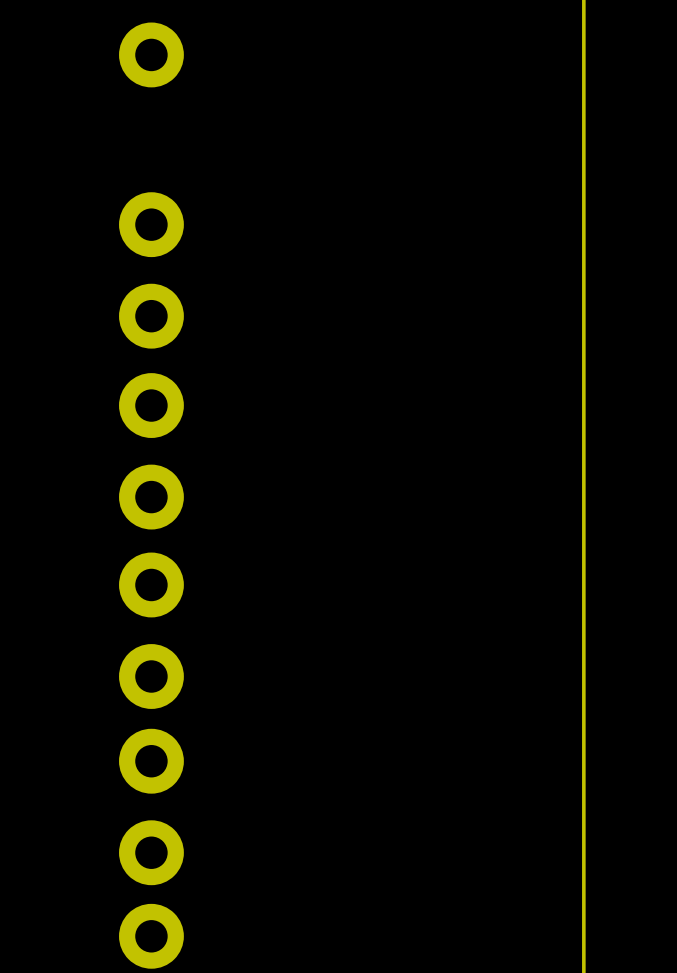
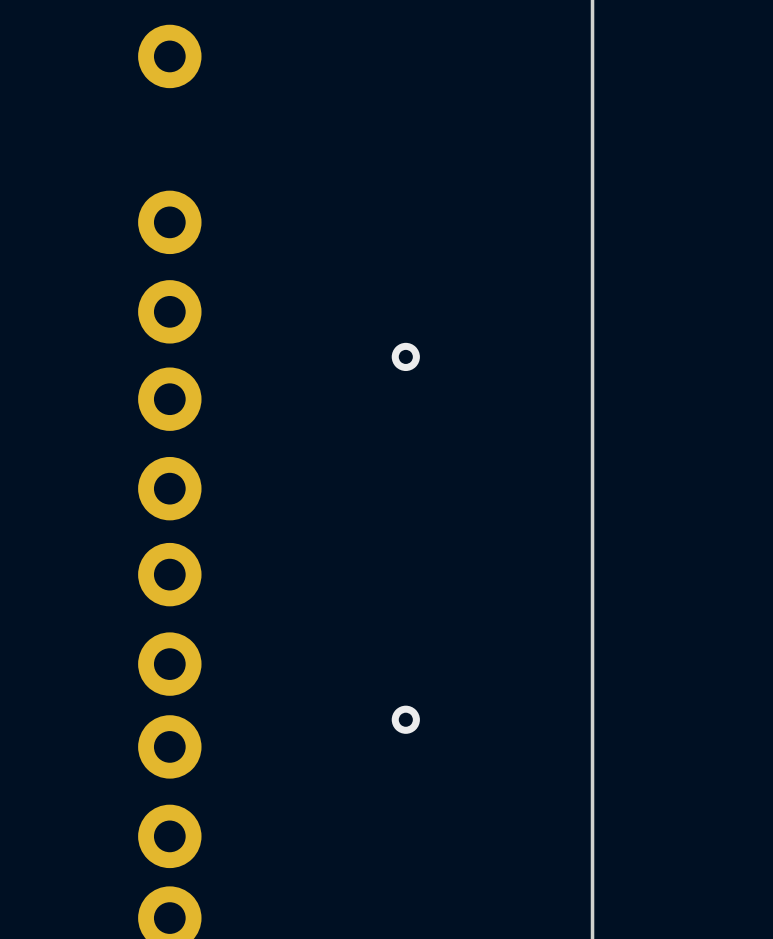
via: none -> (405, 356)
via: none -> (405, 719)

